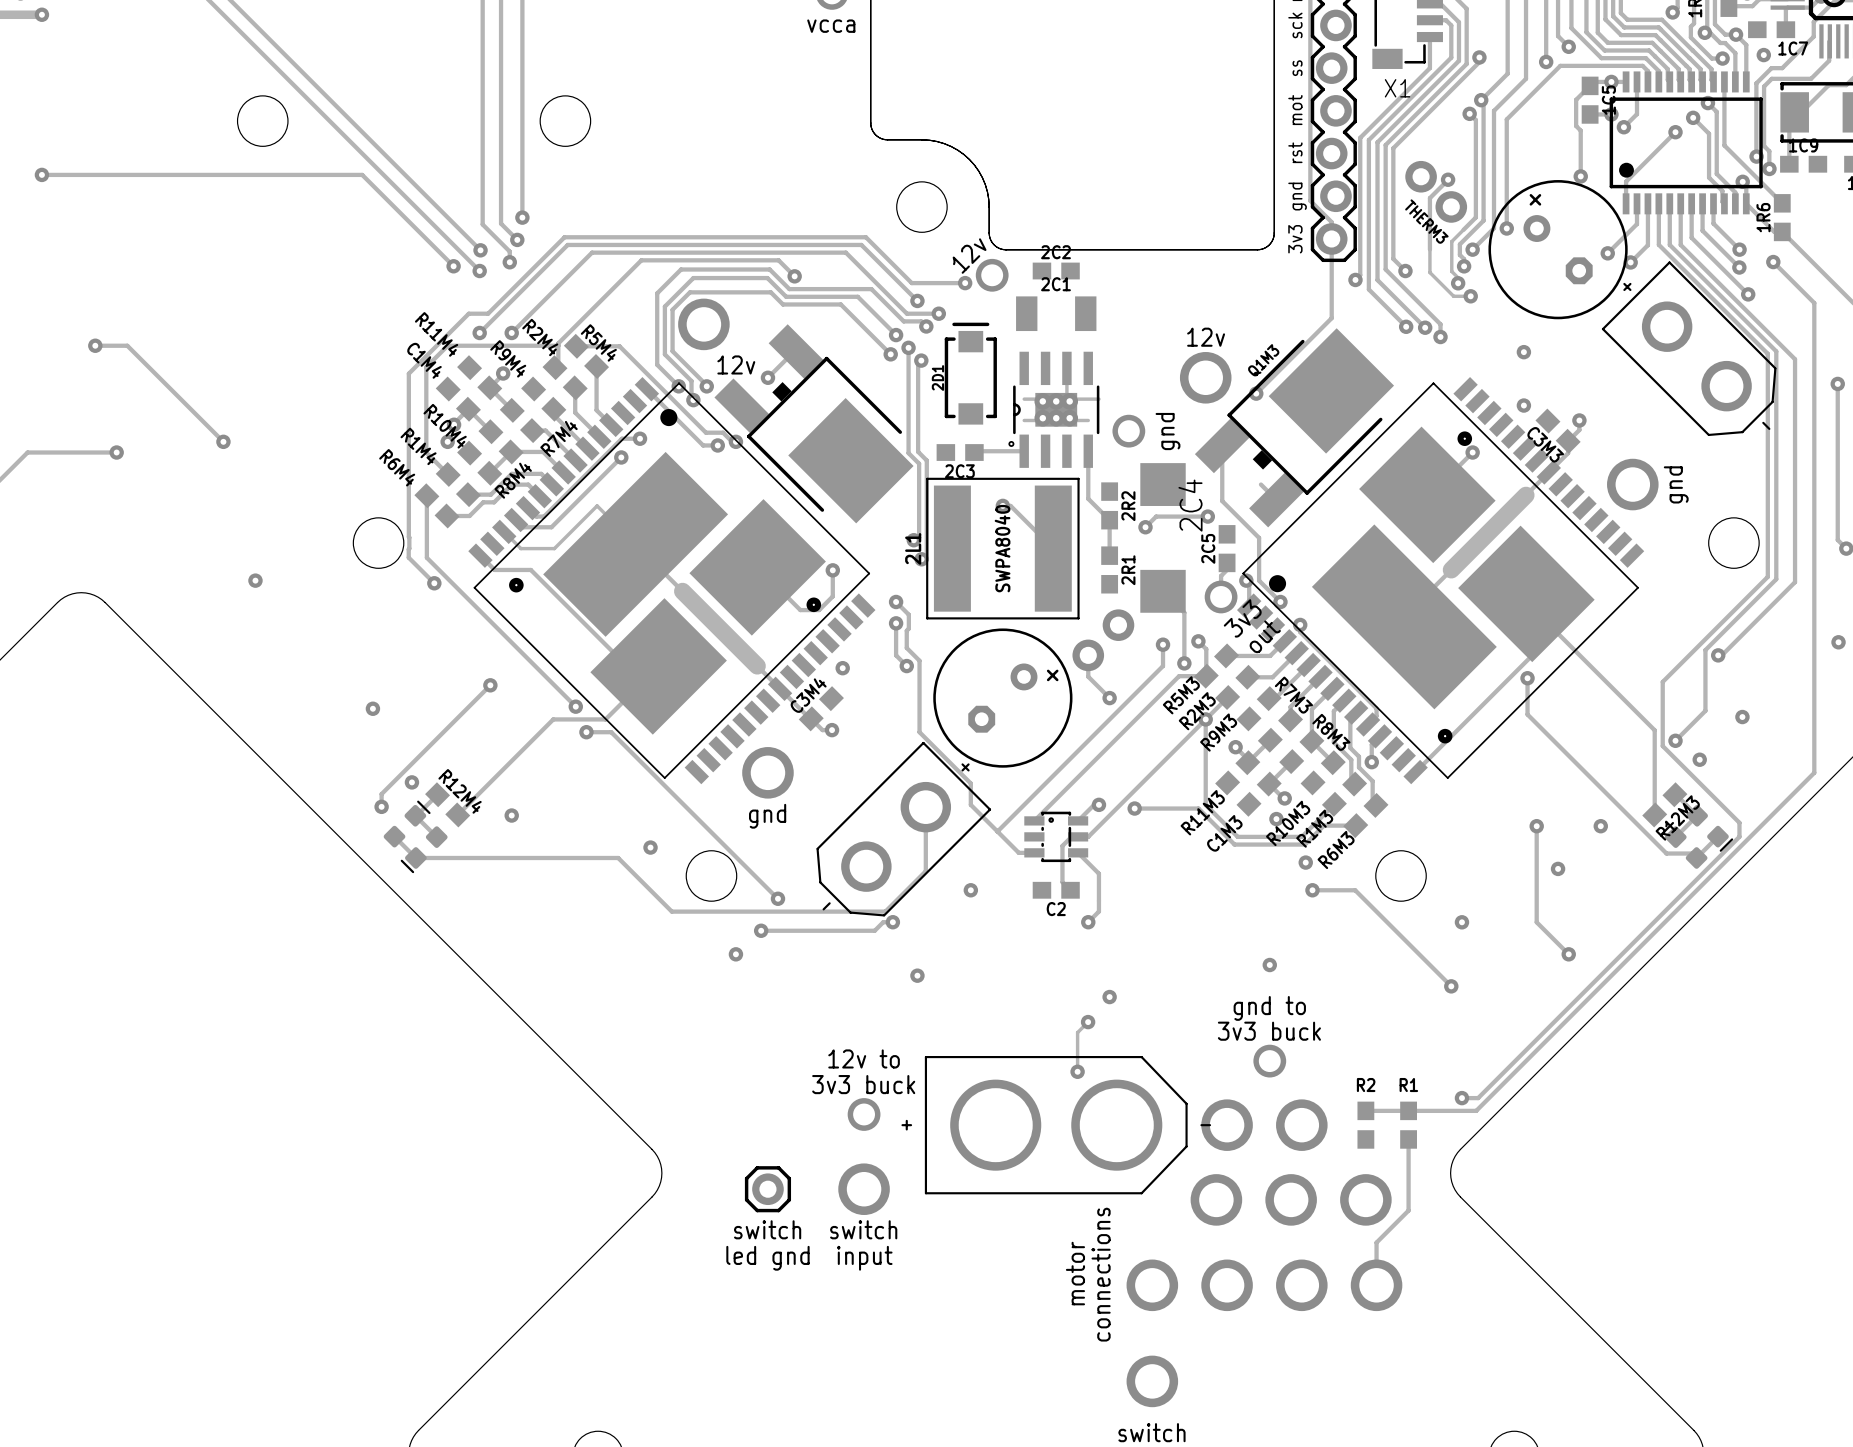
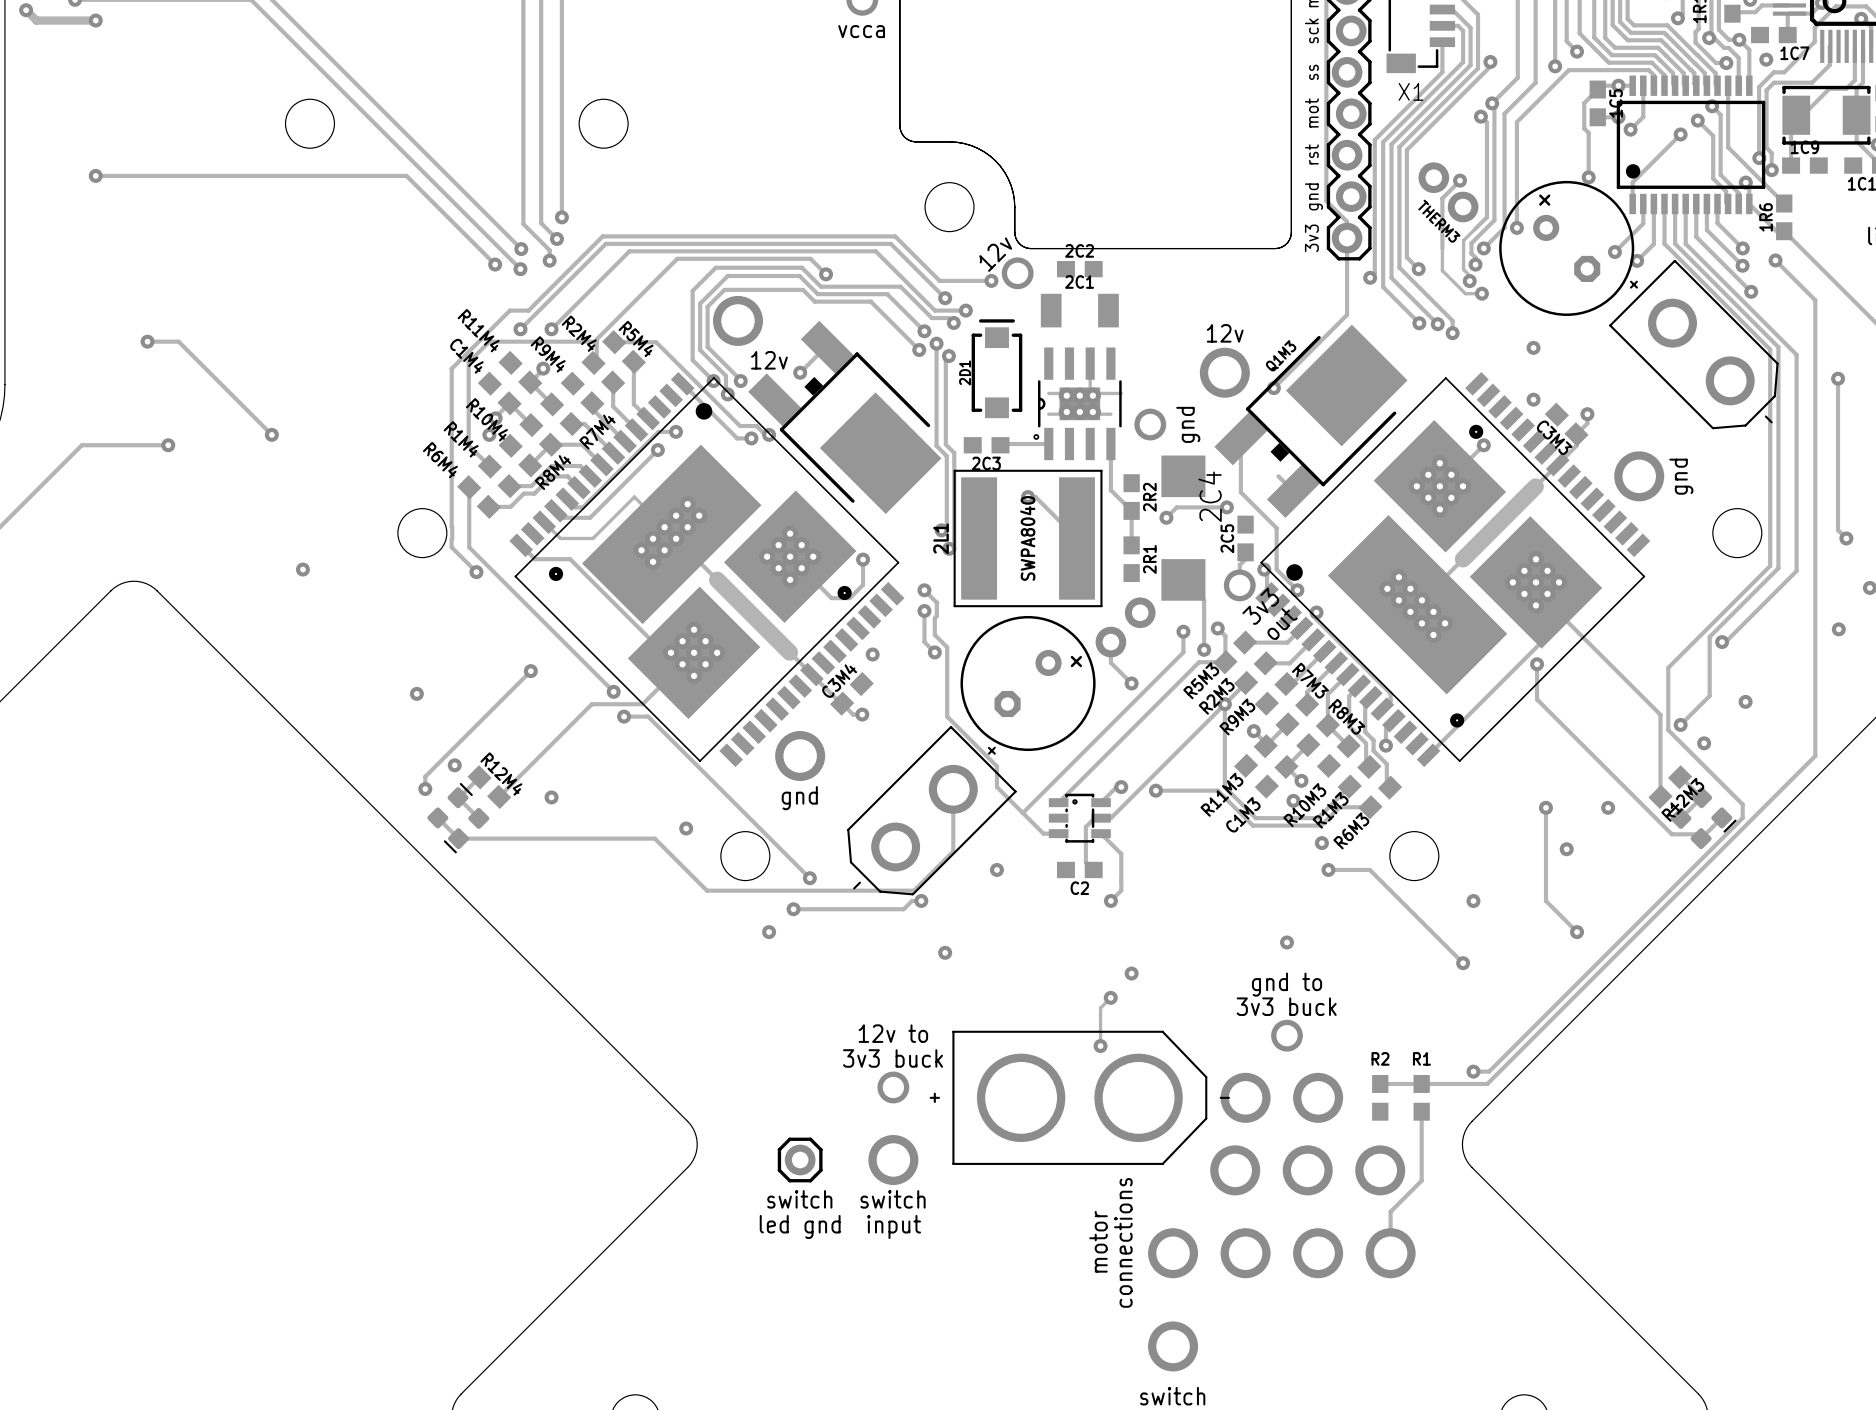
part footprint: [468, 377, 876, 785] -> [509, 372, 905, 768]
part footprint: [1237, 377, 1645, 785] -> [1255, 372, 1651, 768]

